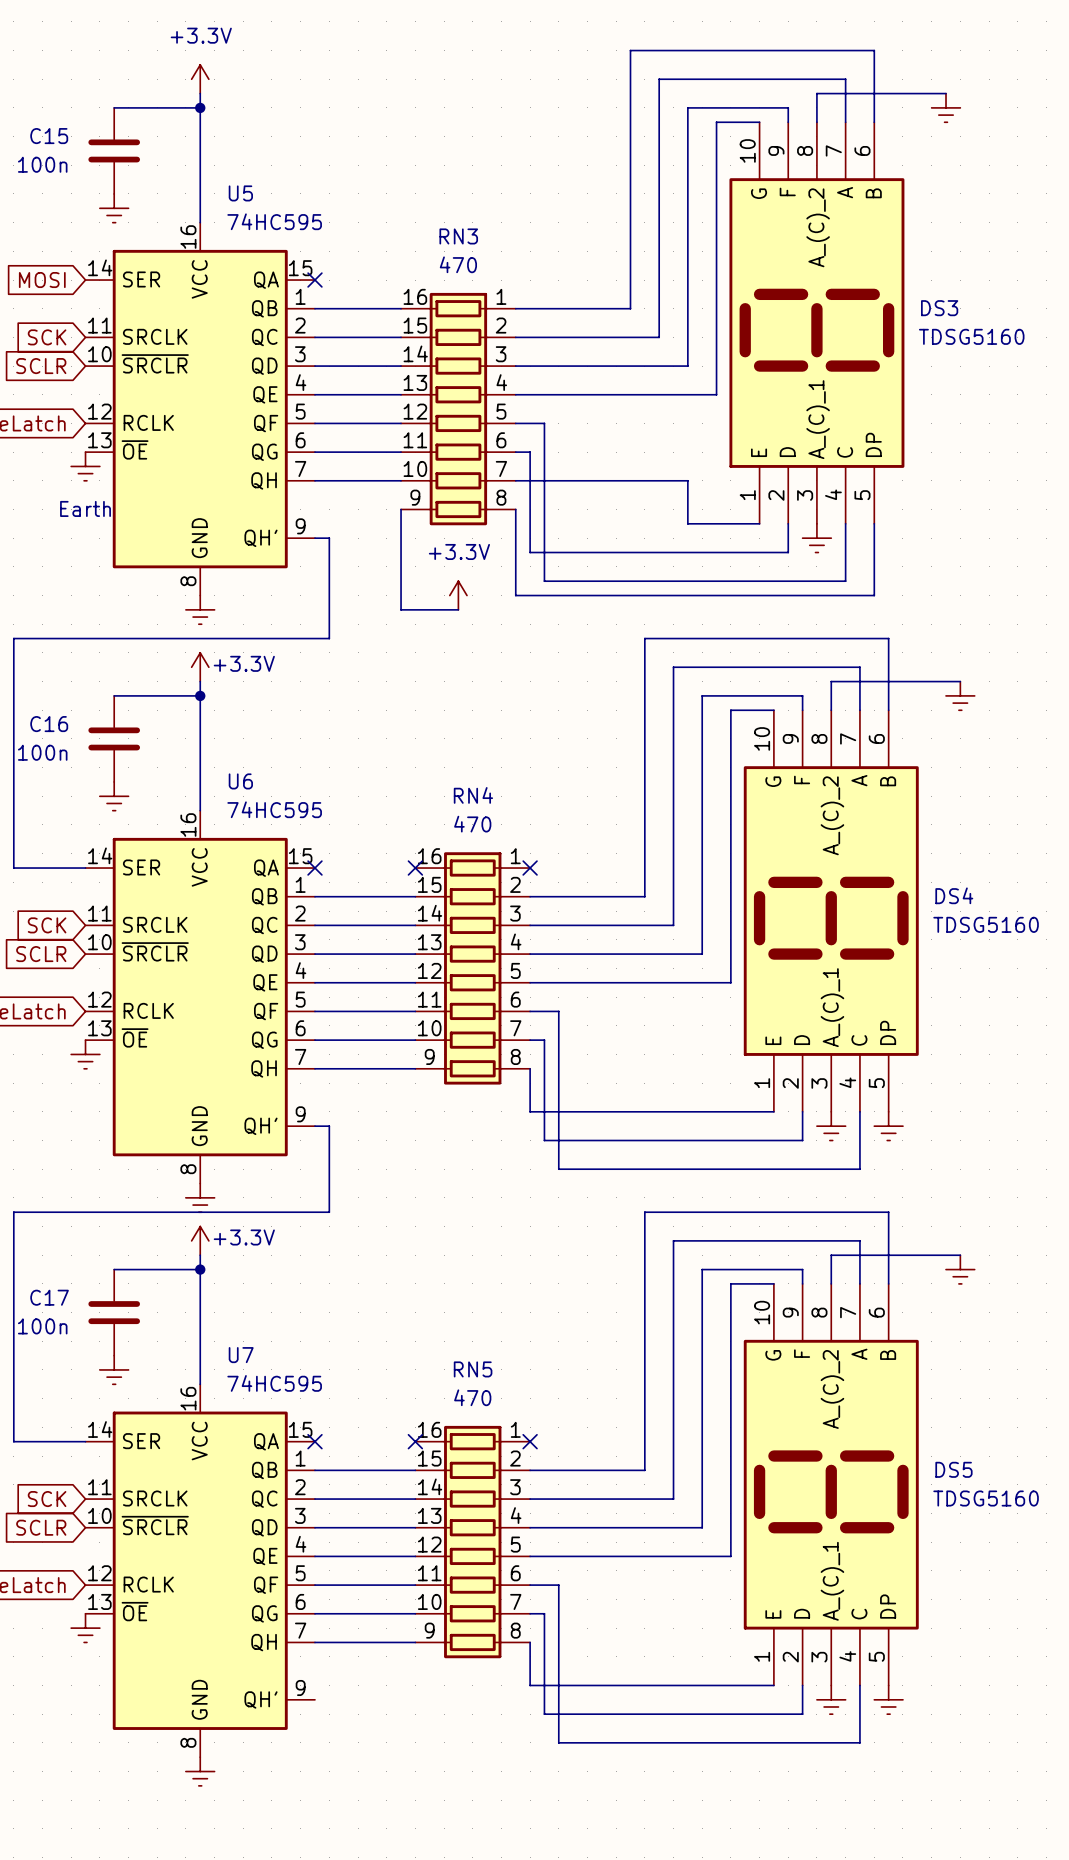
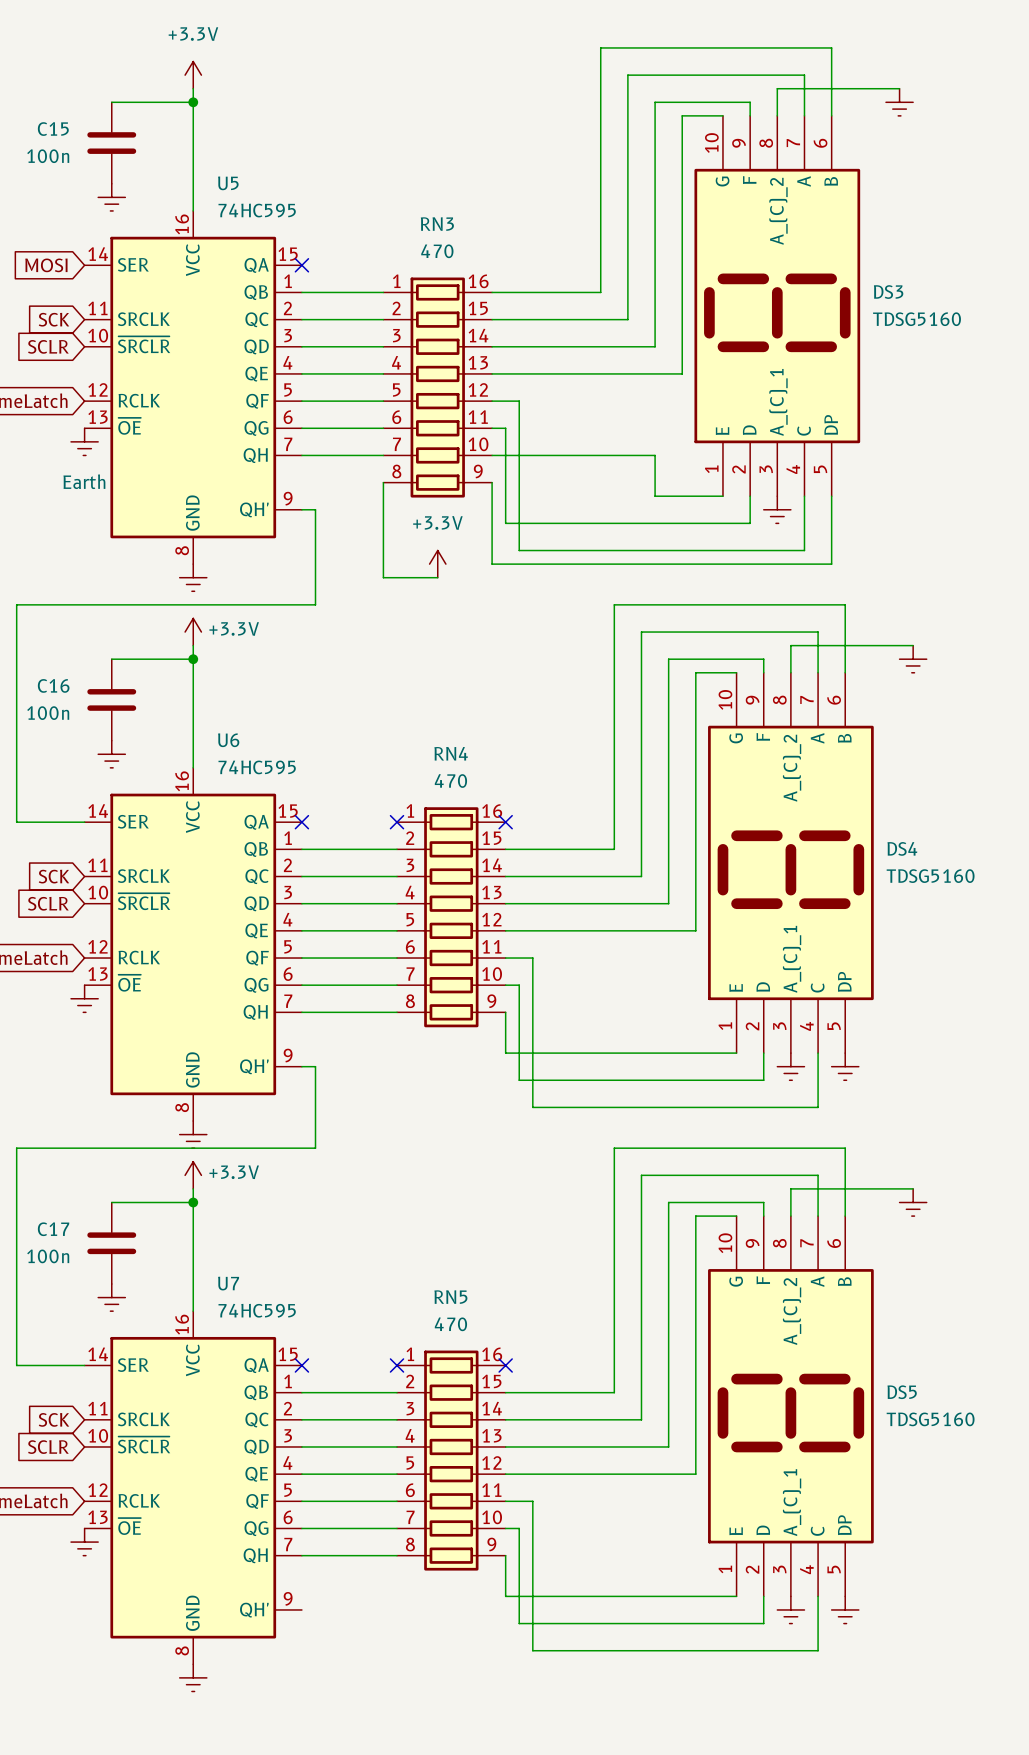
RN3 flip: as is (458, 409) -> left-right (437, 387)
RN4 flip: as is (472, 968) -> left-right (451, 917)
RN5 flip: as is (472, 1542) -> left-right (451, 1460)

